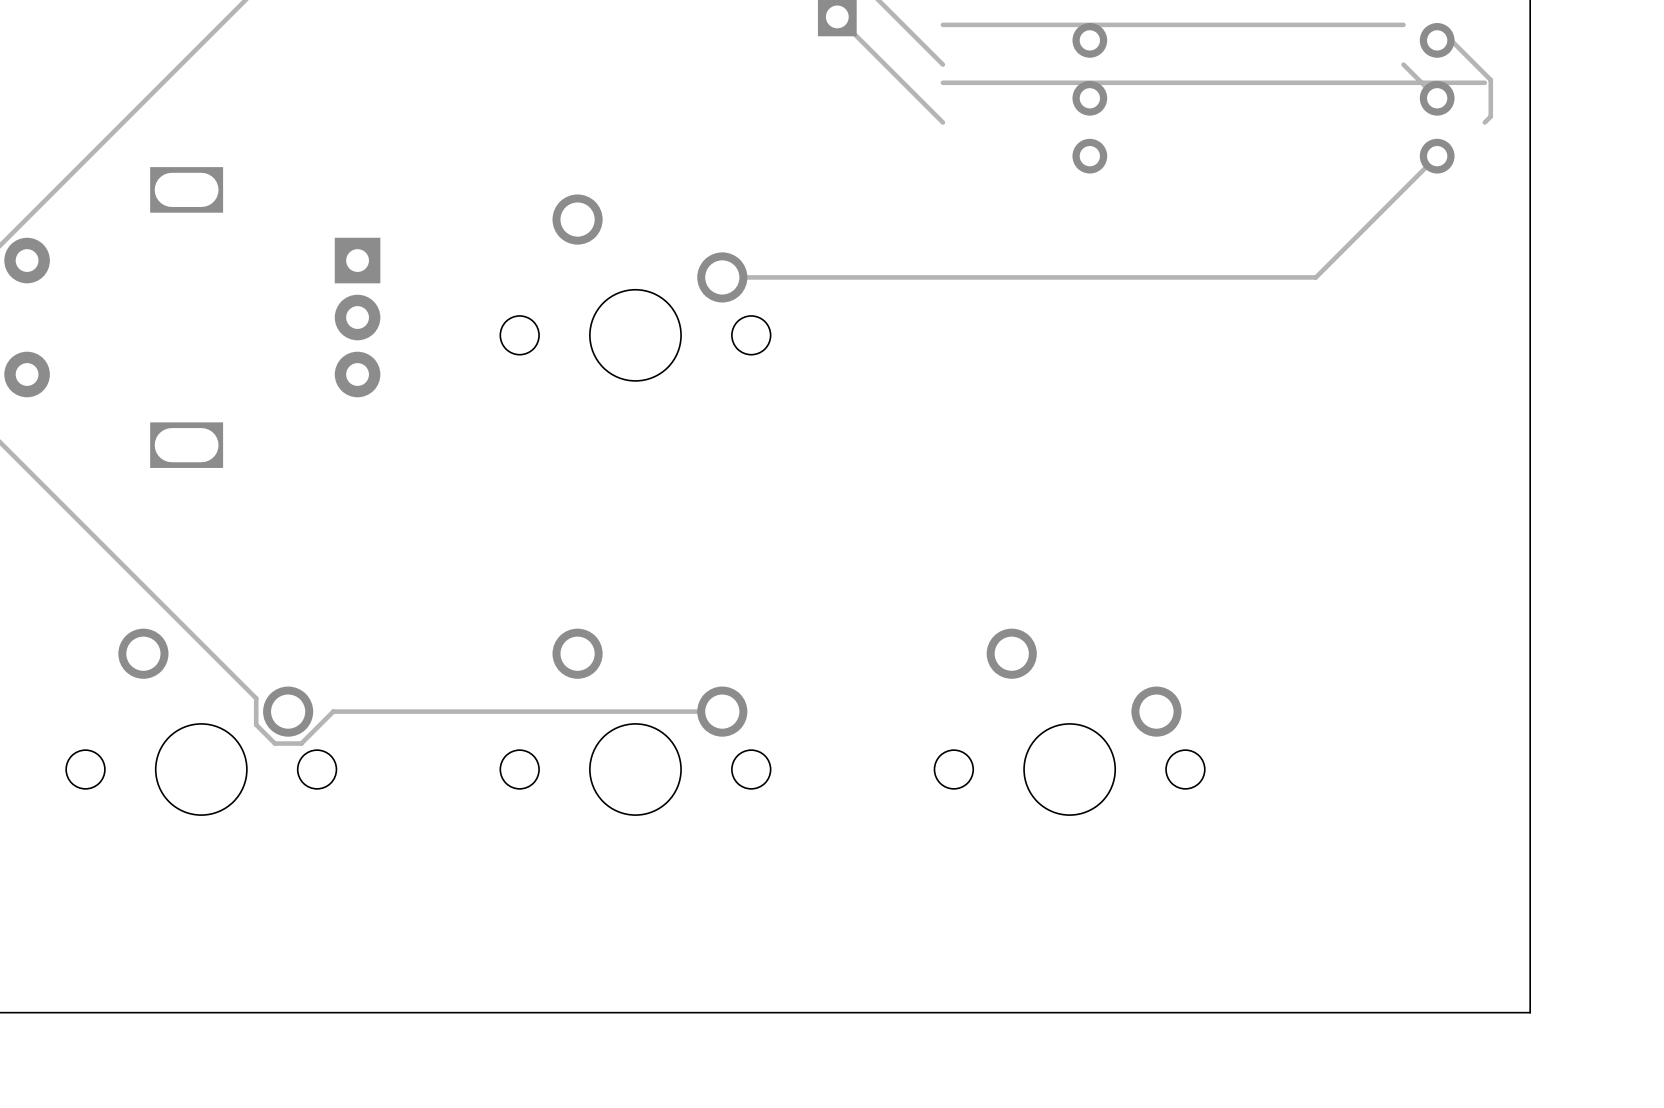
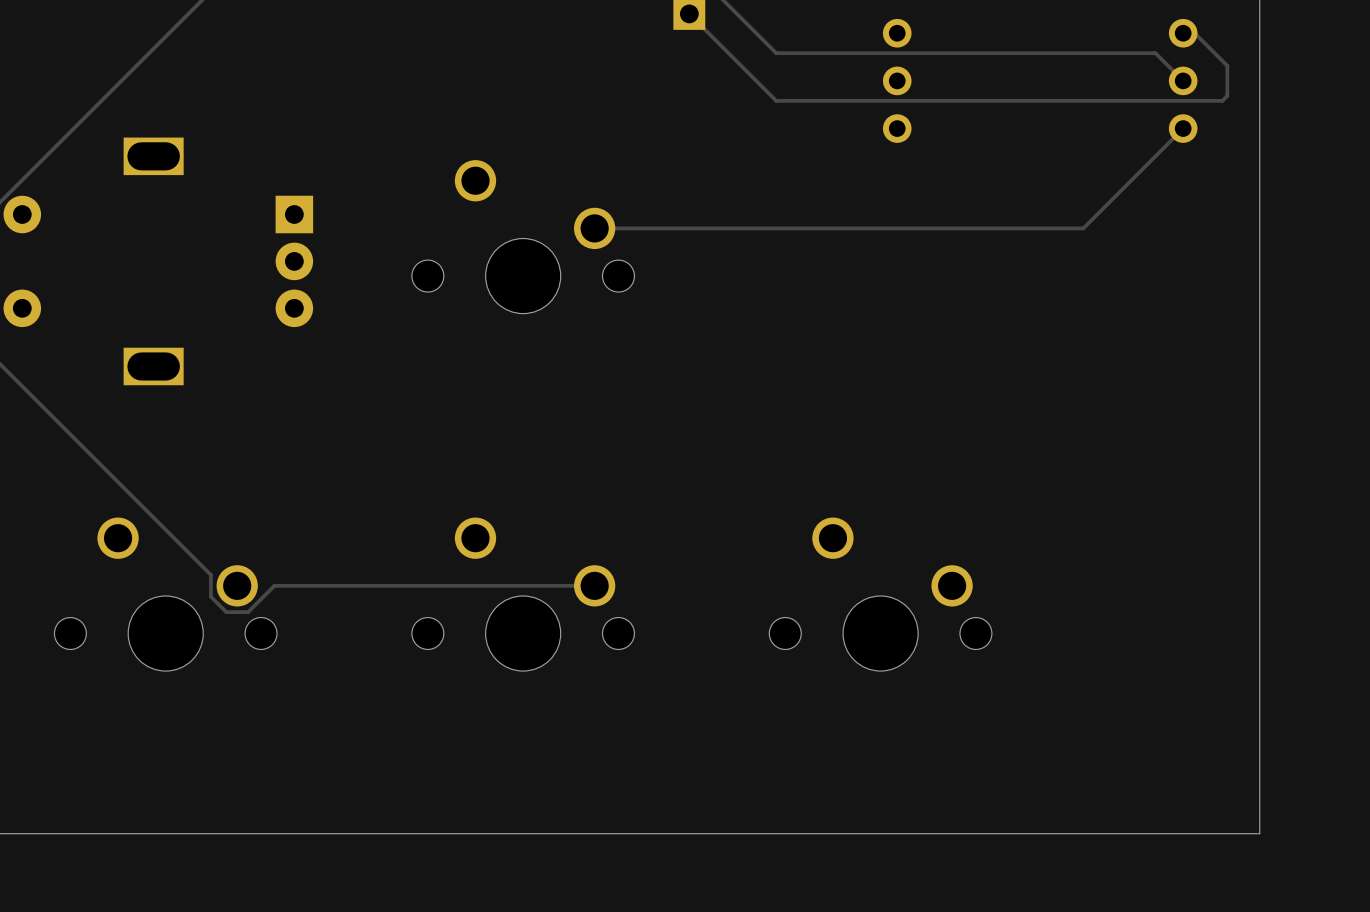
track: (1403, 24) (942, 24) -> (1155, 53) (776, 53)
track: (1484, 82) (942, 82) -> (1222, 100) (776, 100)

